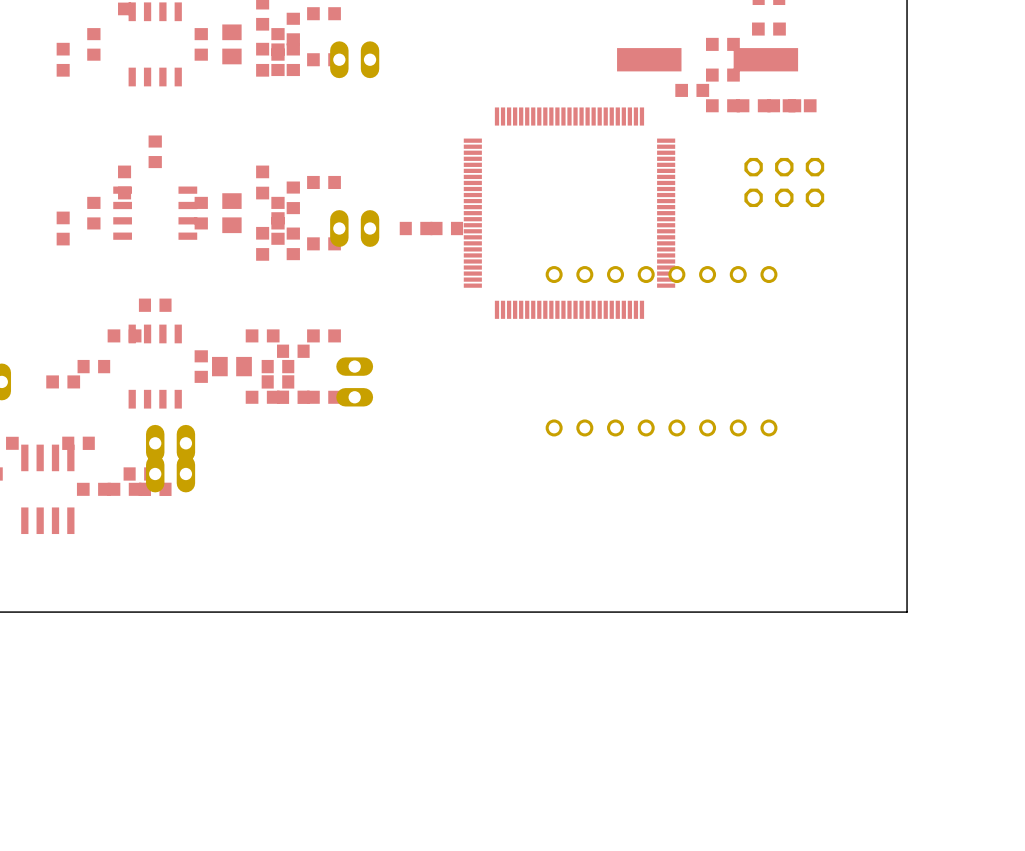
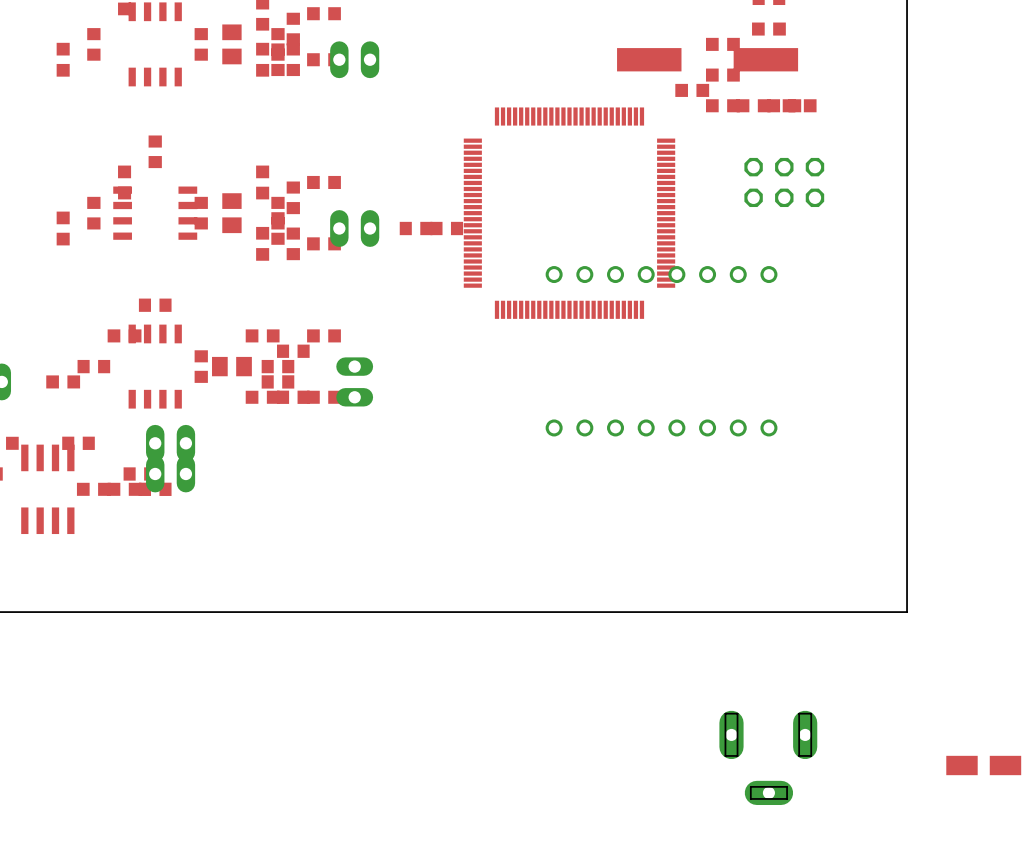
part: none -> (768, 757)
part: none -> (983, 765)

